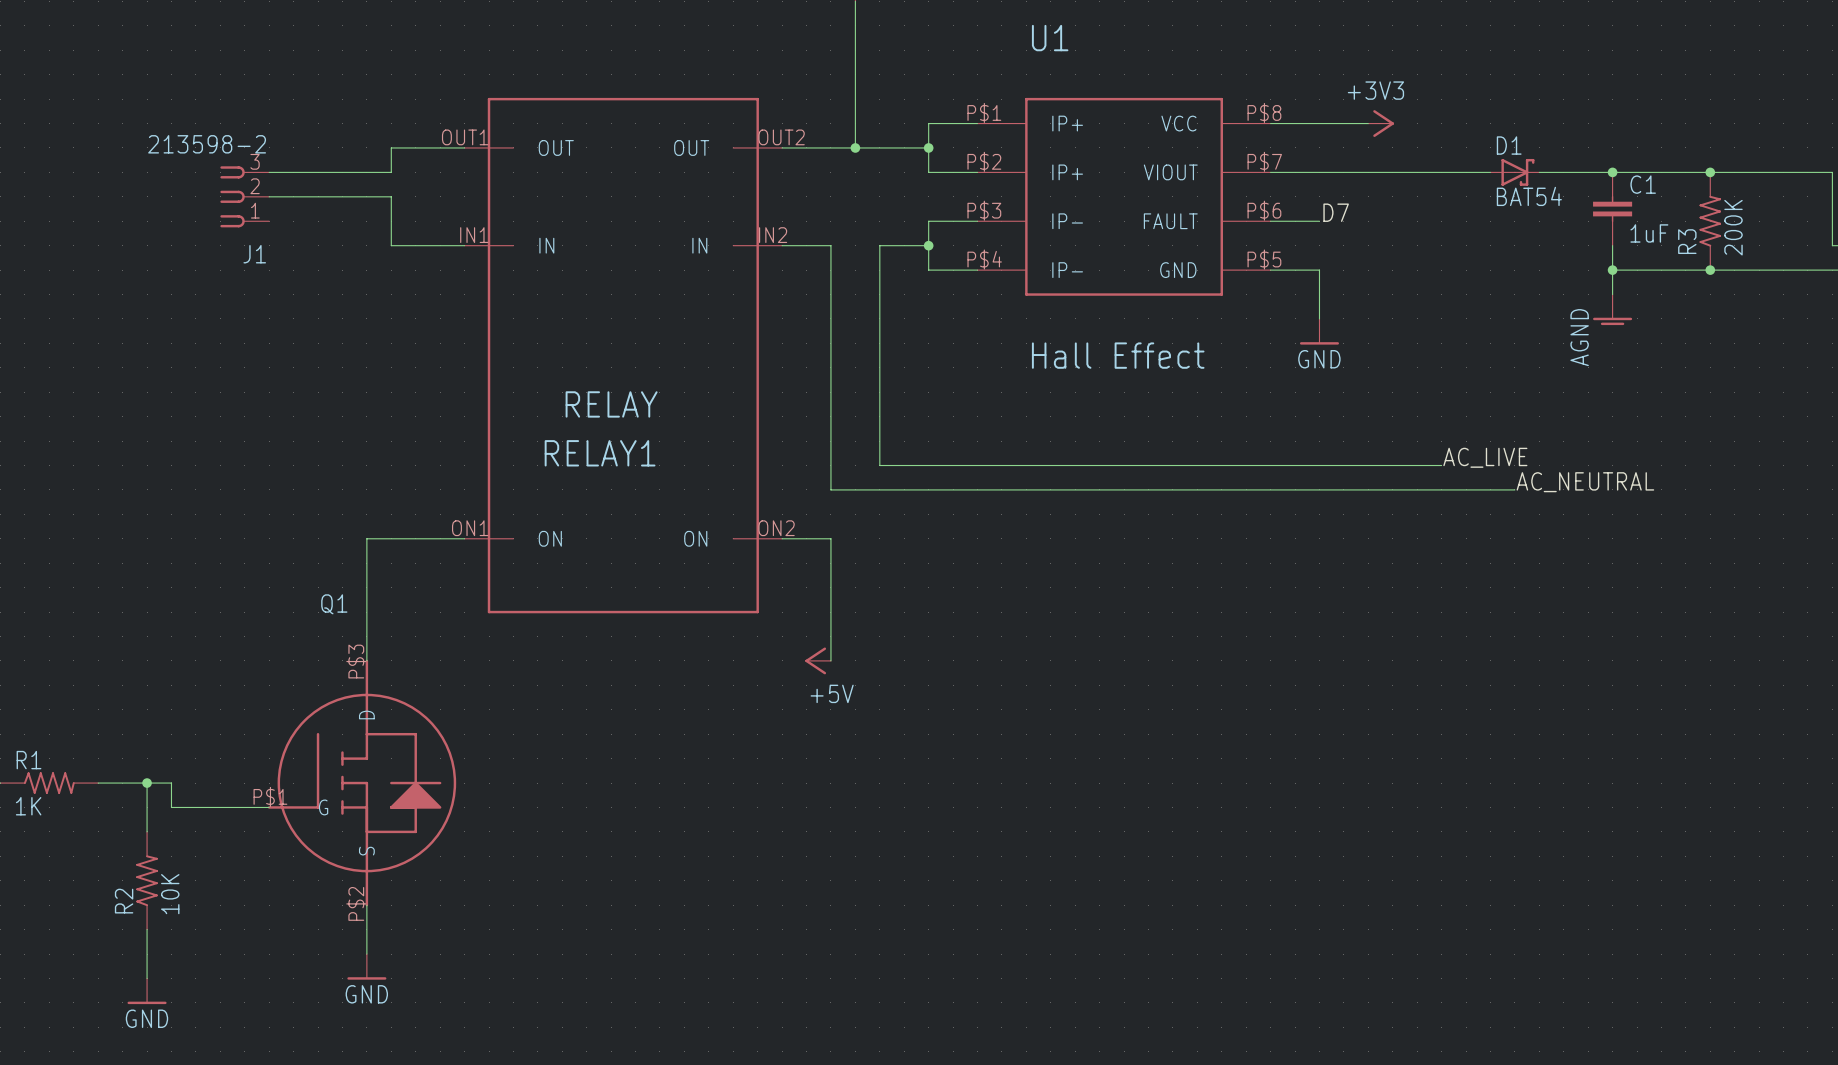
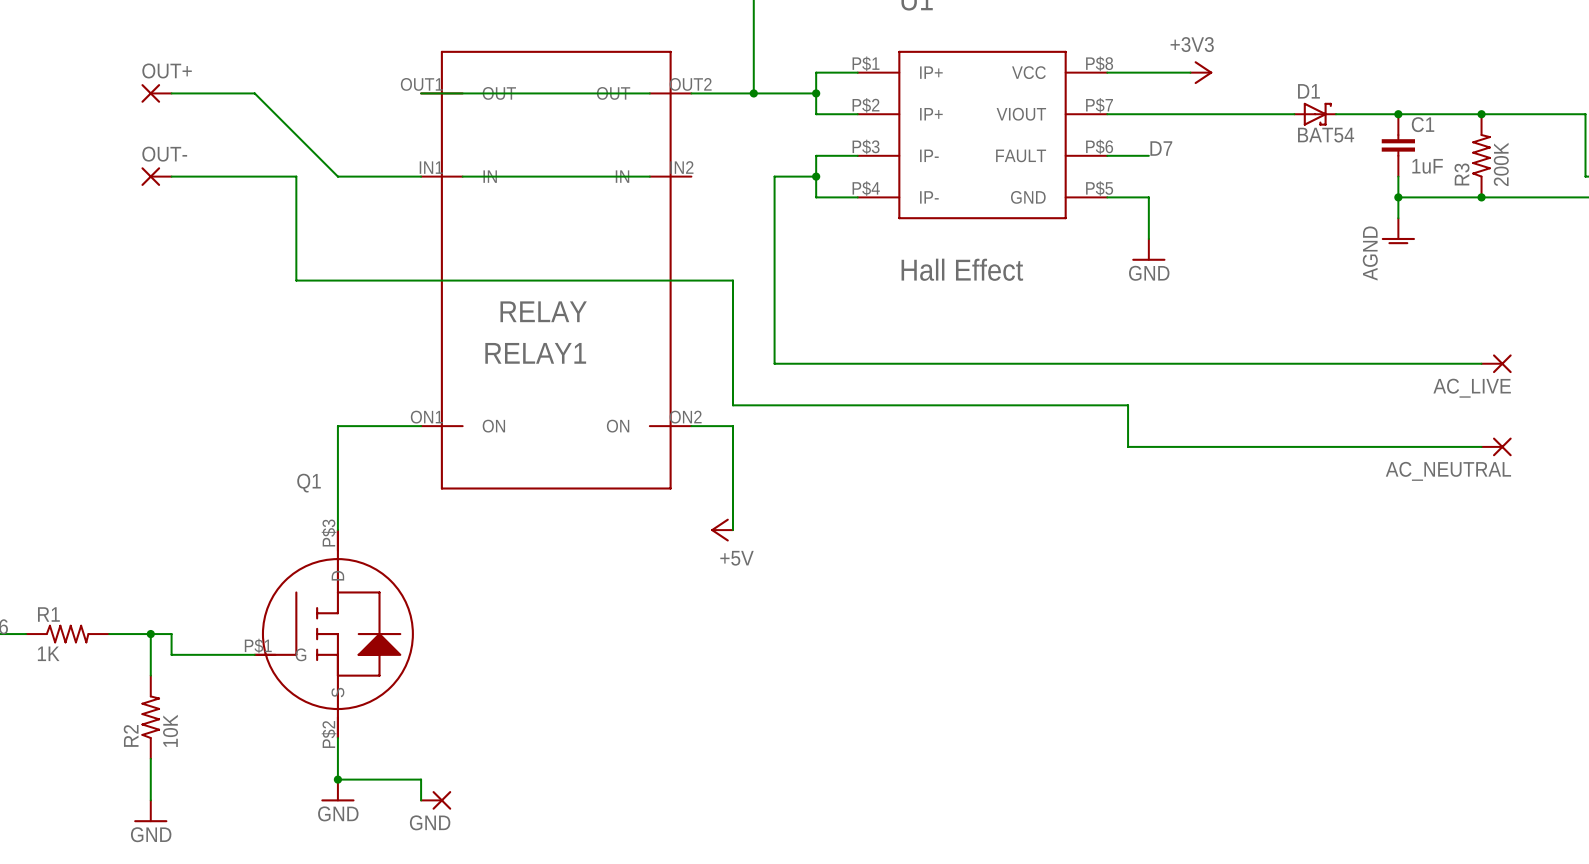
OUT+: none -> (156, 93)
wire: (464, 147) (391, 147) (391, 172) (269, 172) -> (421, 93) (649, 93)
J1: 213598-2 (244, 196) -> none
wire: (269, 196) (391, 196) (391, 245) -> (171, 93) (254, 93) (337, 176) (358, 176)
OUT-: none -> (156, 176)
wire: none -> (462, 176) (649, 176)
wire: (782, 245) (830, 245) (830, 367) -> (171, 176) (296, 176) (296, 280) (732, 280)
label: AC_LIVE (1485, 457) -> none
wire: none -> (1252, 363) (1481, 363)
AC_LIVE: none -> (1496, 363)
label: AC_NEUTRAL (1585, 482) -> none
wire: (830, 489) (1514, 489) -> (732, 384) (732, 405) (1128, 405) (1128, 446) (1481, 446)
AC_NEUTRAL: none -> (1496, 446)
wire: none -> (337, 779) (421, 779) (421, 800)
junction: none -> (337, 779)
GND: none -> (436, 800)

